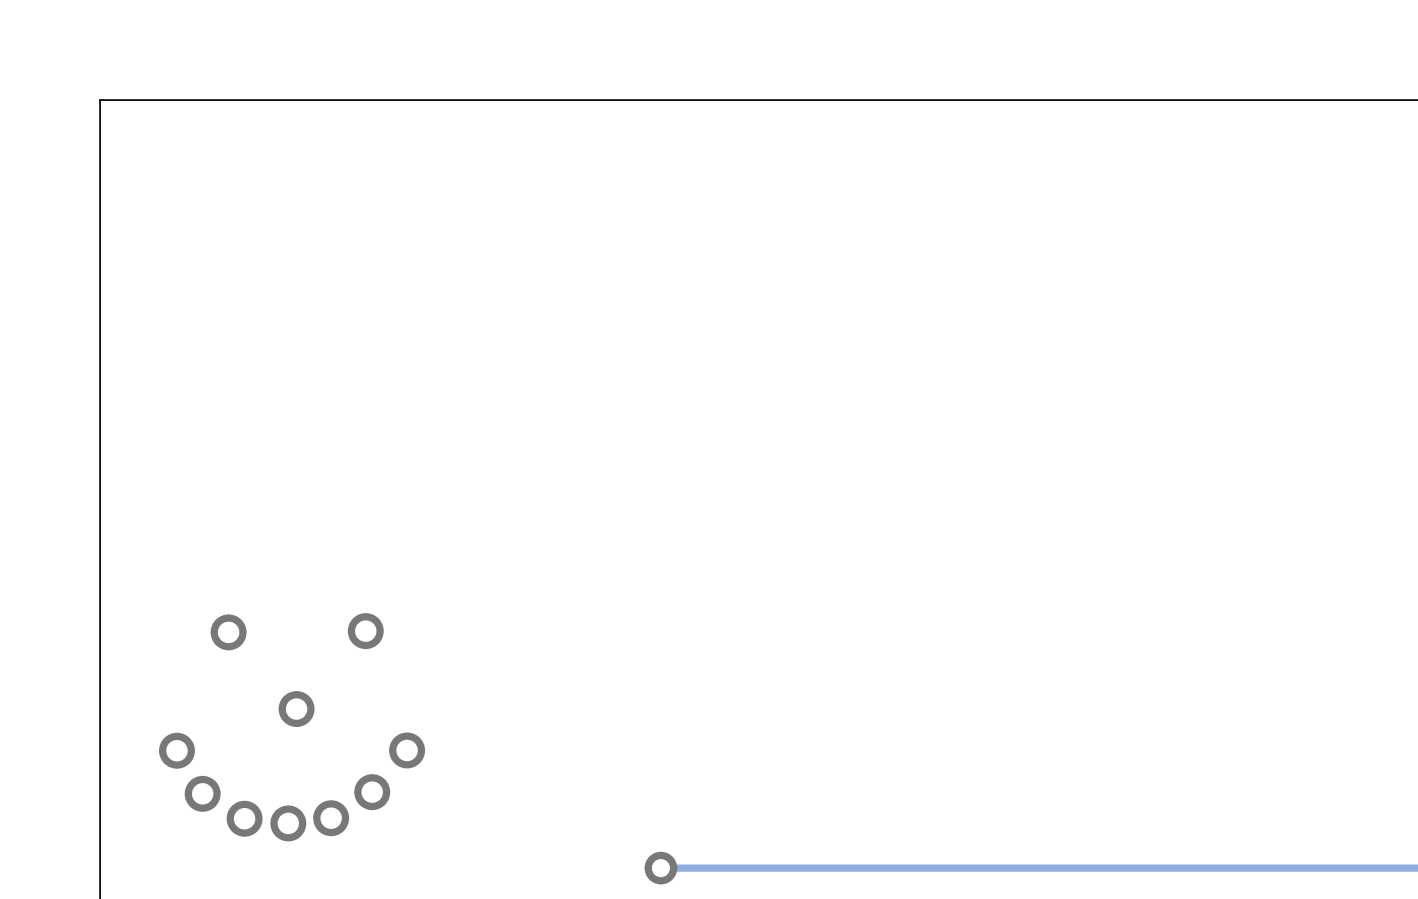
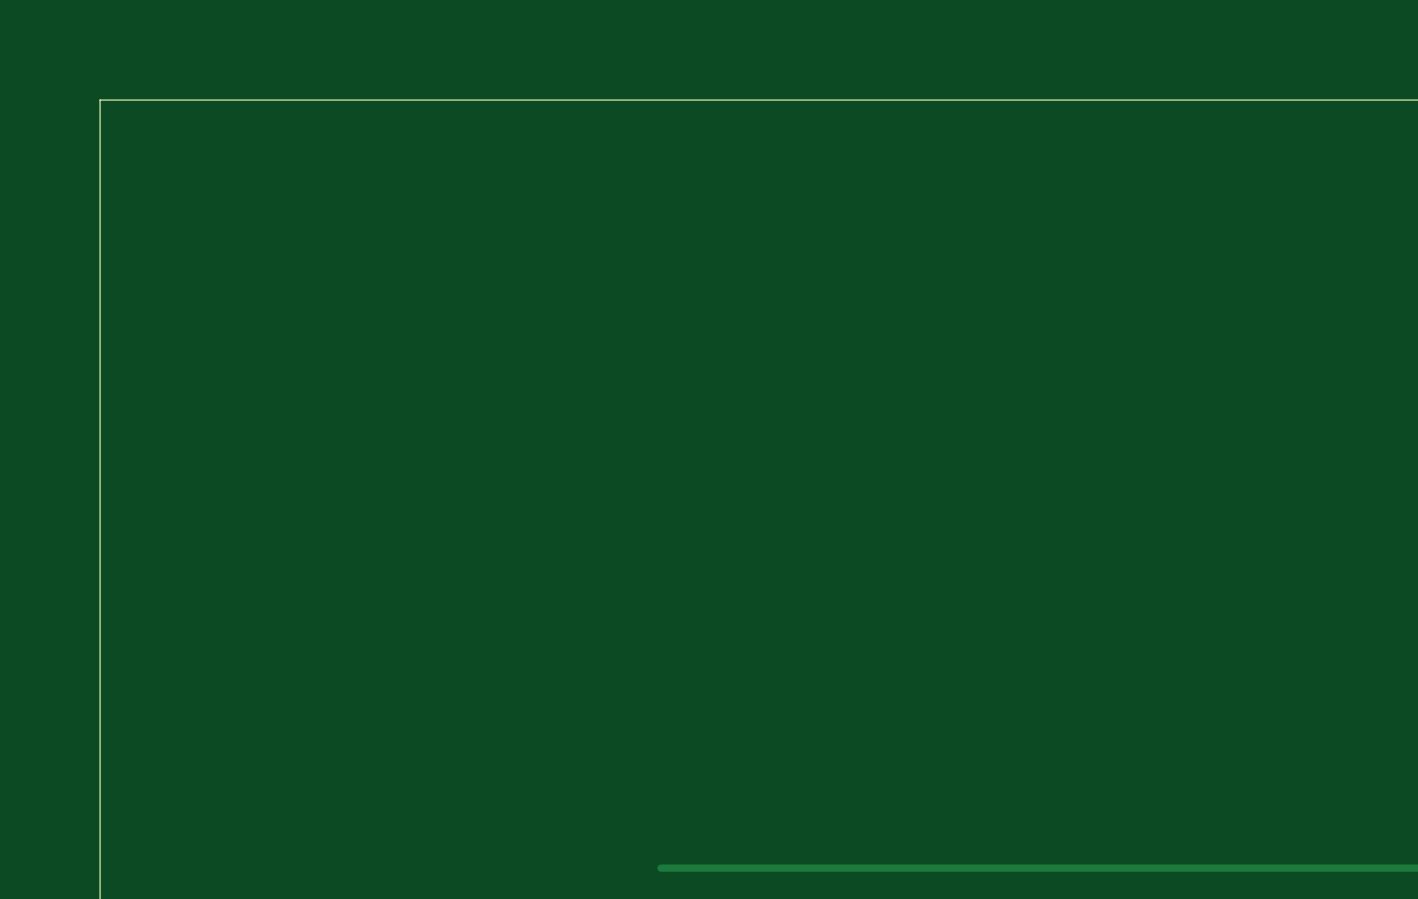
via: (365, 631) -> none
via: (228, 632) -> none
via: (296, 709) -> none
via: (176, 750) -> none
via: (407, 750) -> none
via: (372, 792) -> none
via: (202, 793) -> none
via: (244, 818) -> none
via: (331, 818) -> none
via: (288, 823) -> none
via: (660, 868) -> none

